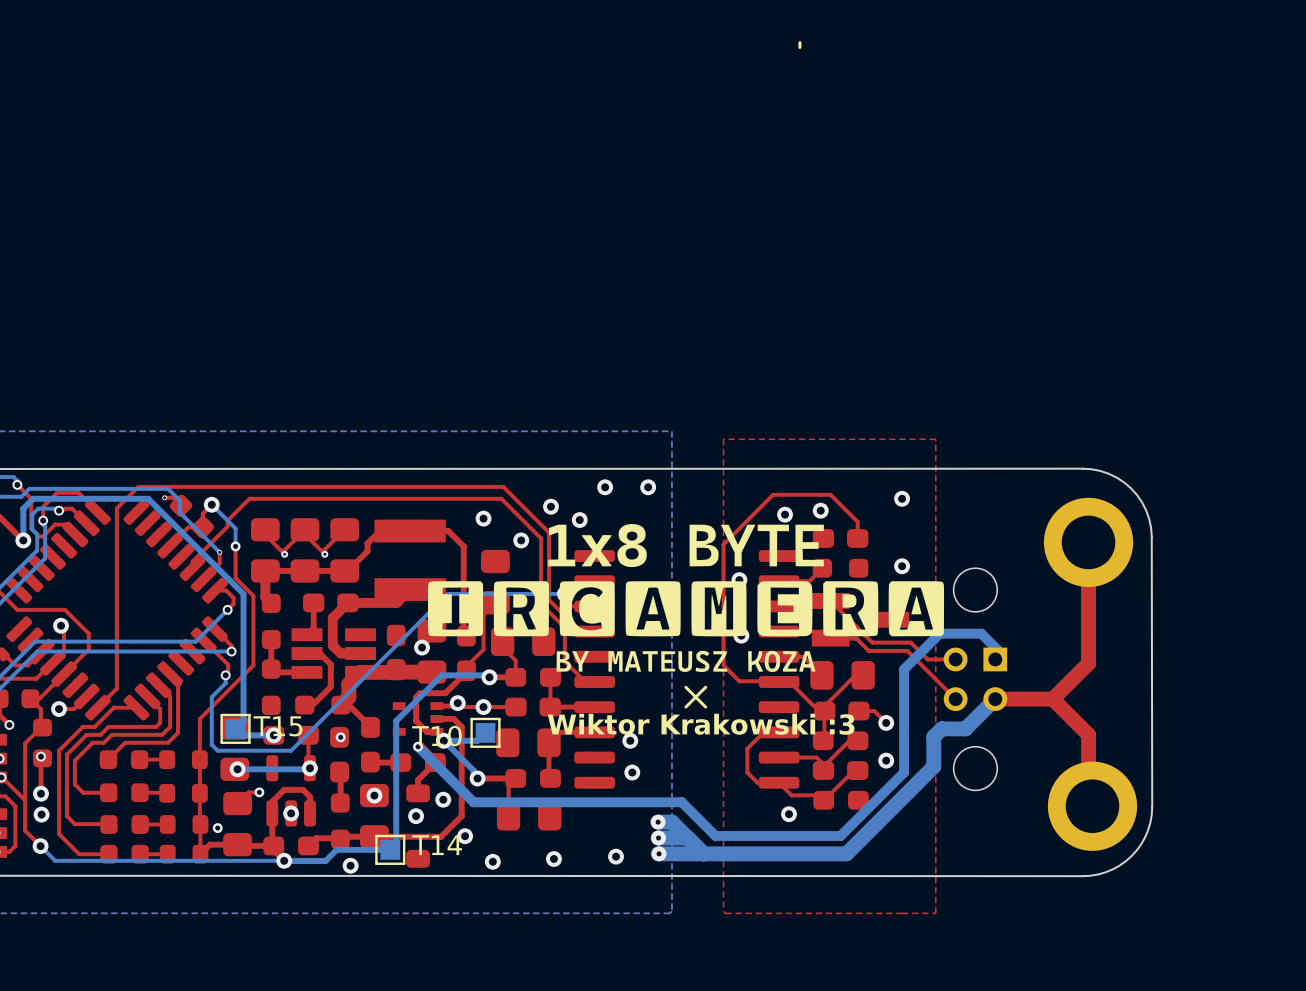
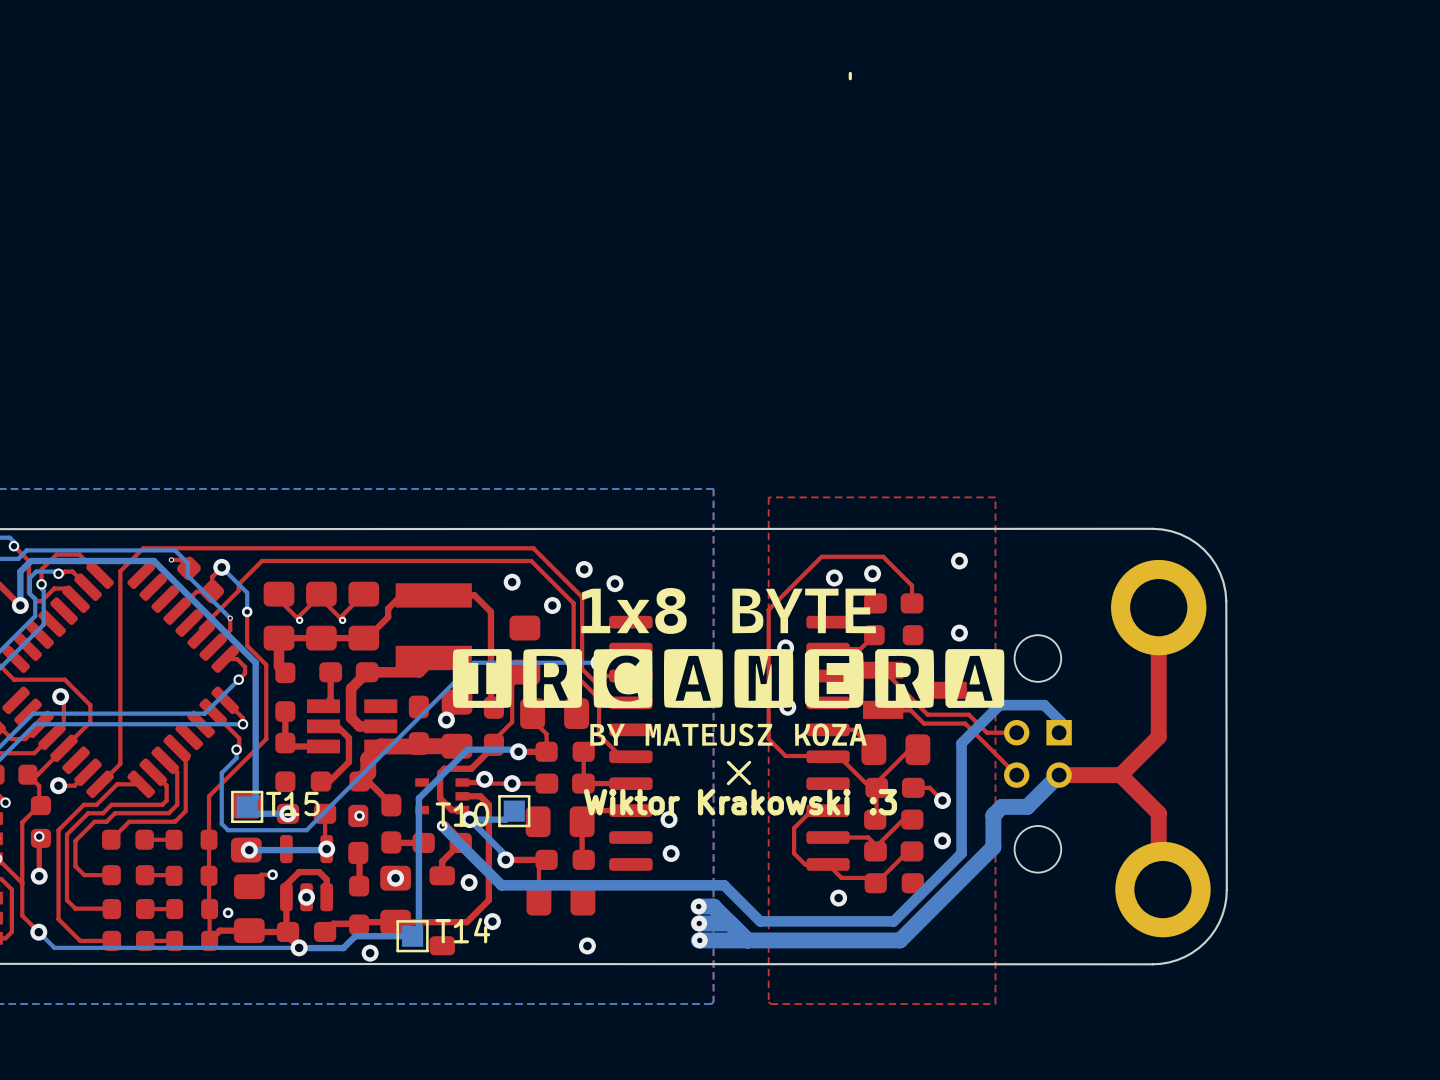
via: (605, 487) -> none
via: (648, 487) -> none
via: (41, 814) -> none
via: (416, 816) -> none
via: (616, 856) -> none
via: (492, 861) -> none

